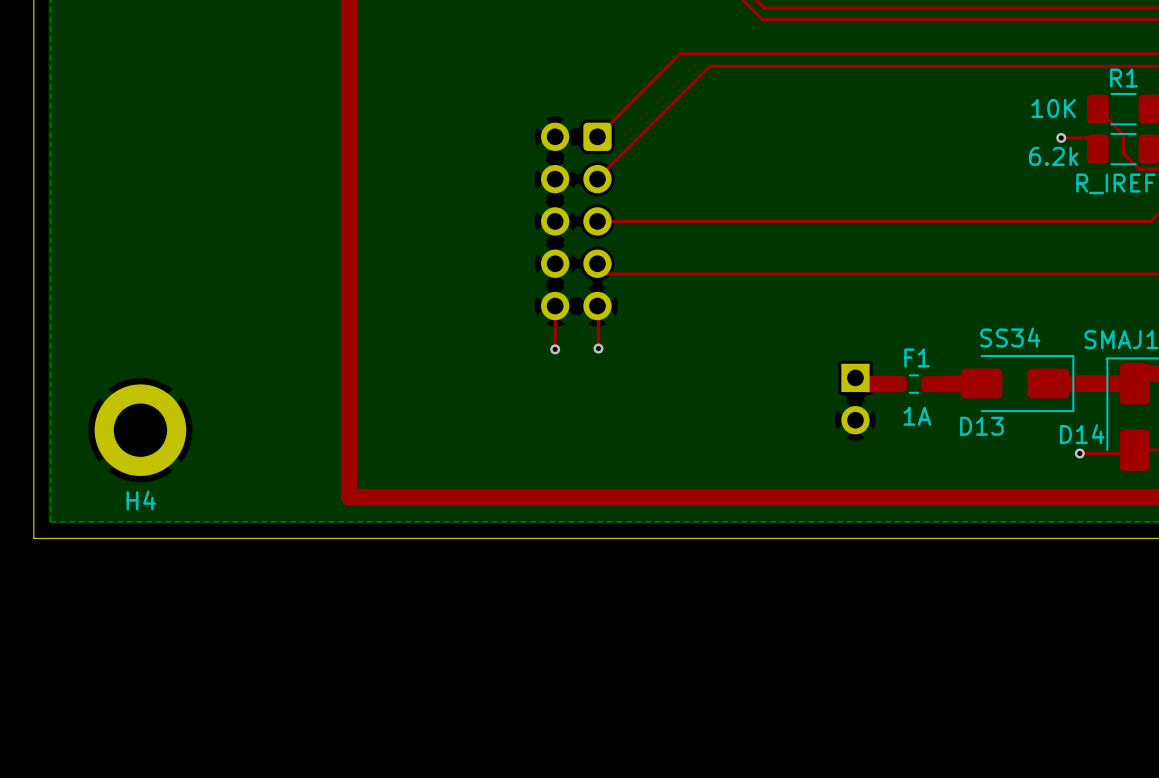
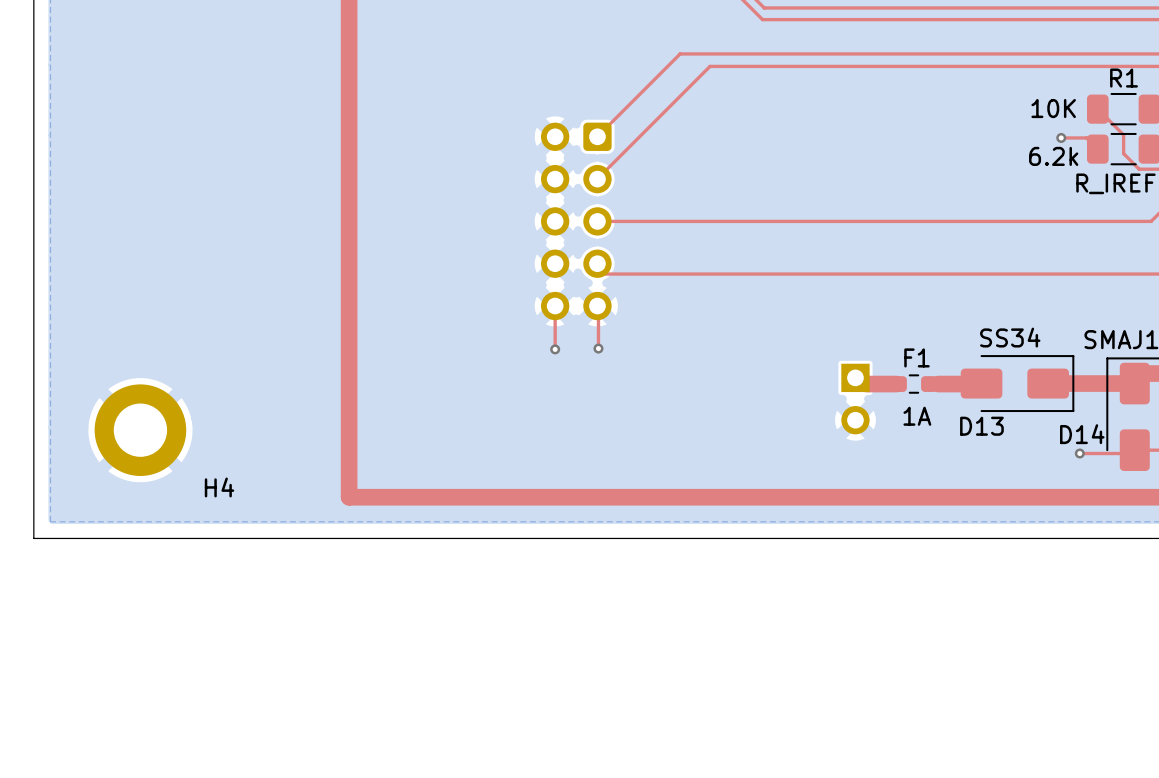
H4 name position: H4 (141, 500) -> H4 (219, 487)

